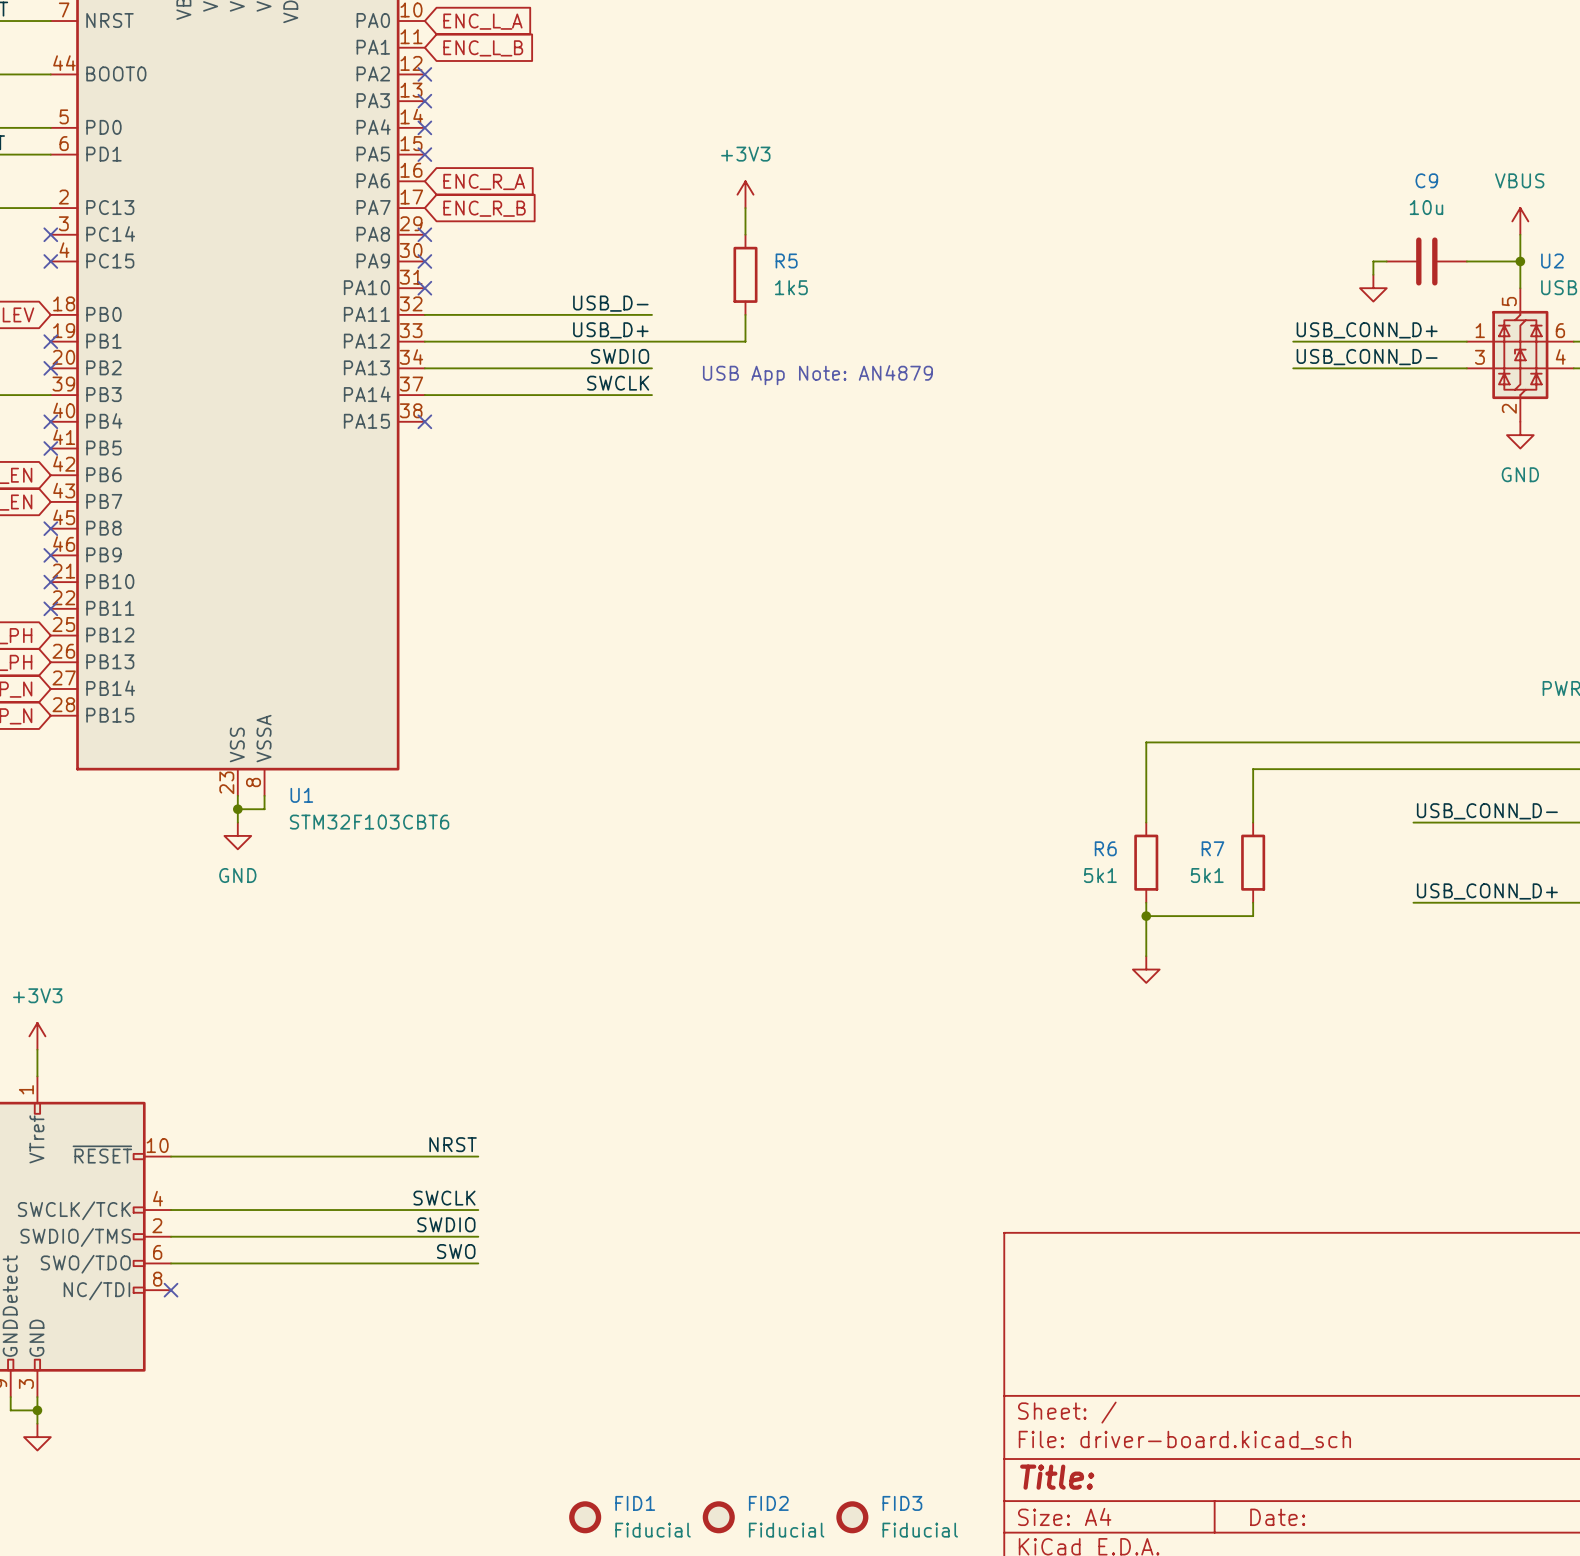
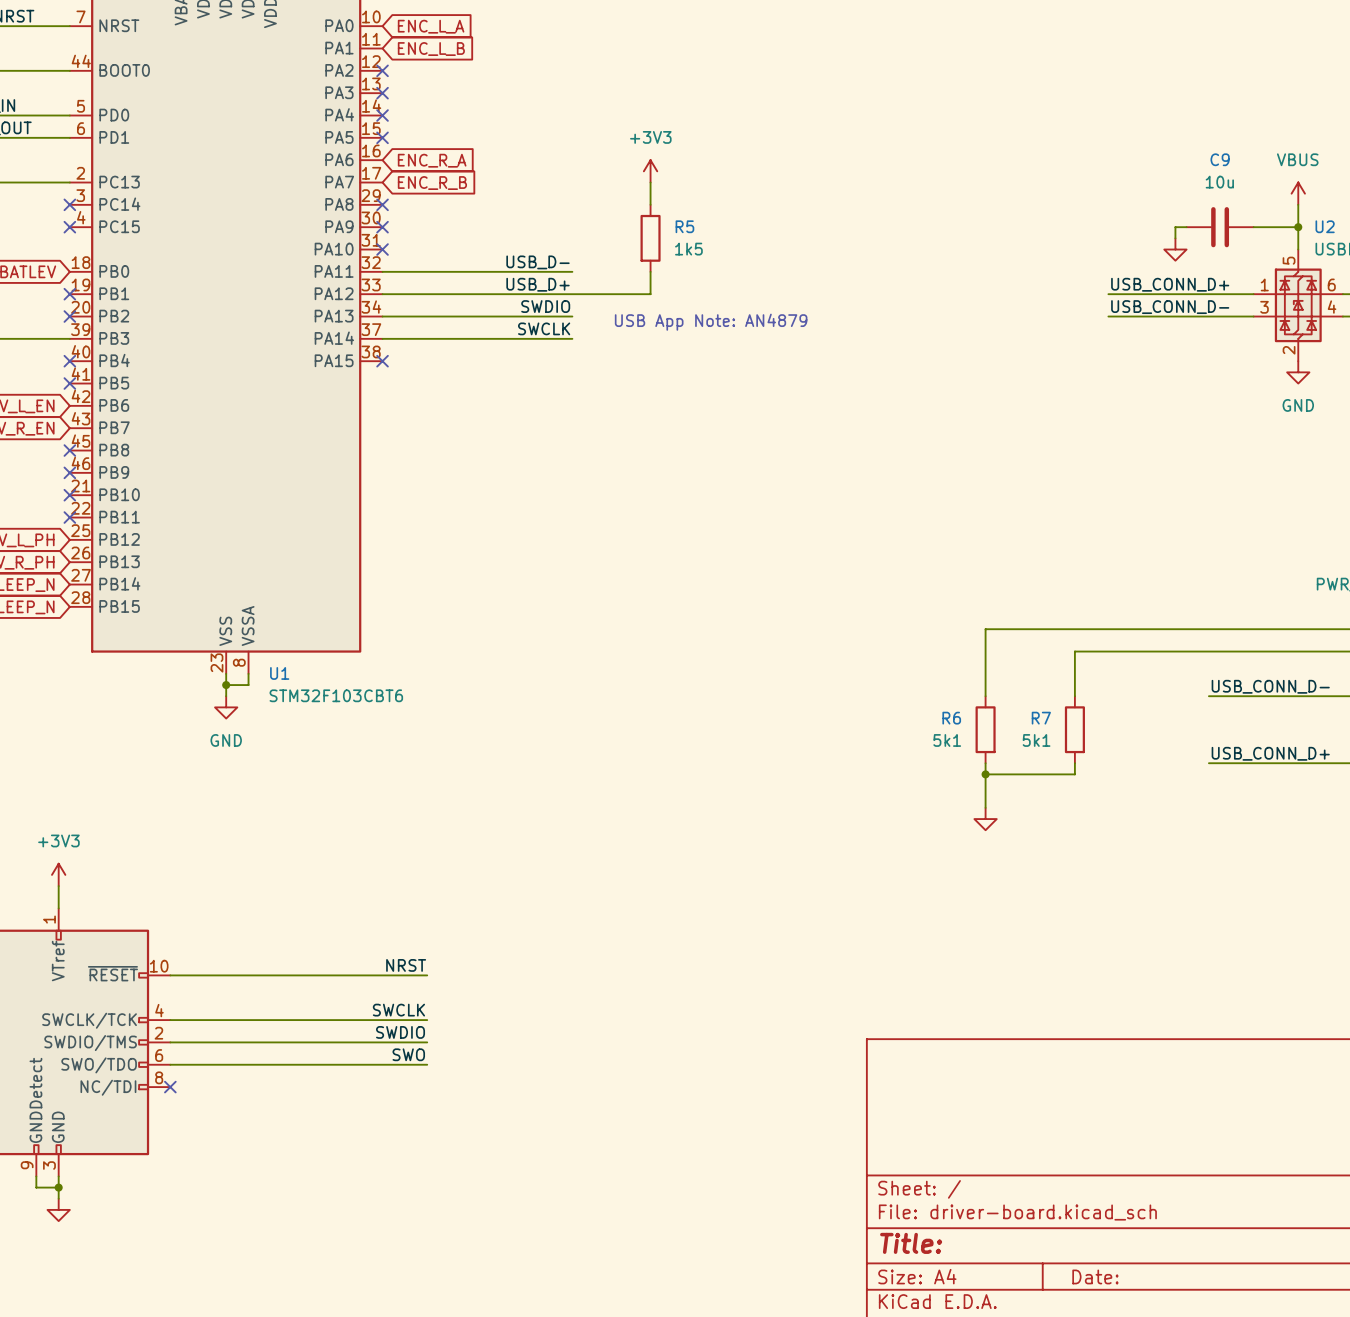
FID1: Fiducial (585, 1517) -> none
FID2: Fiducial (718, 1517) -> none
FID3: Fiducial (852, 1517) -> none

